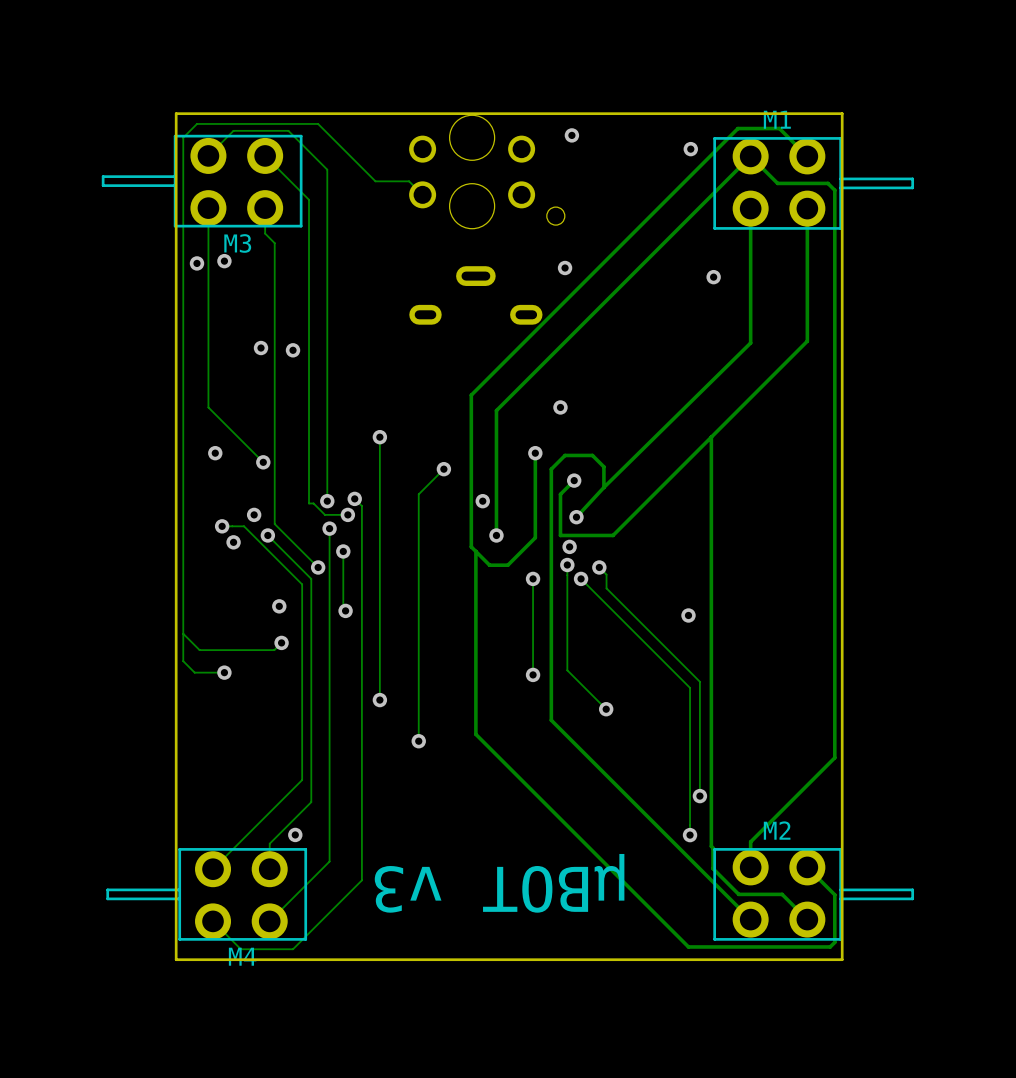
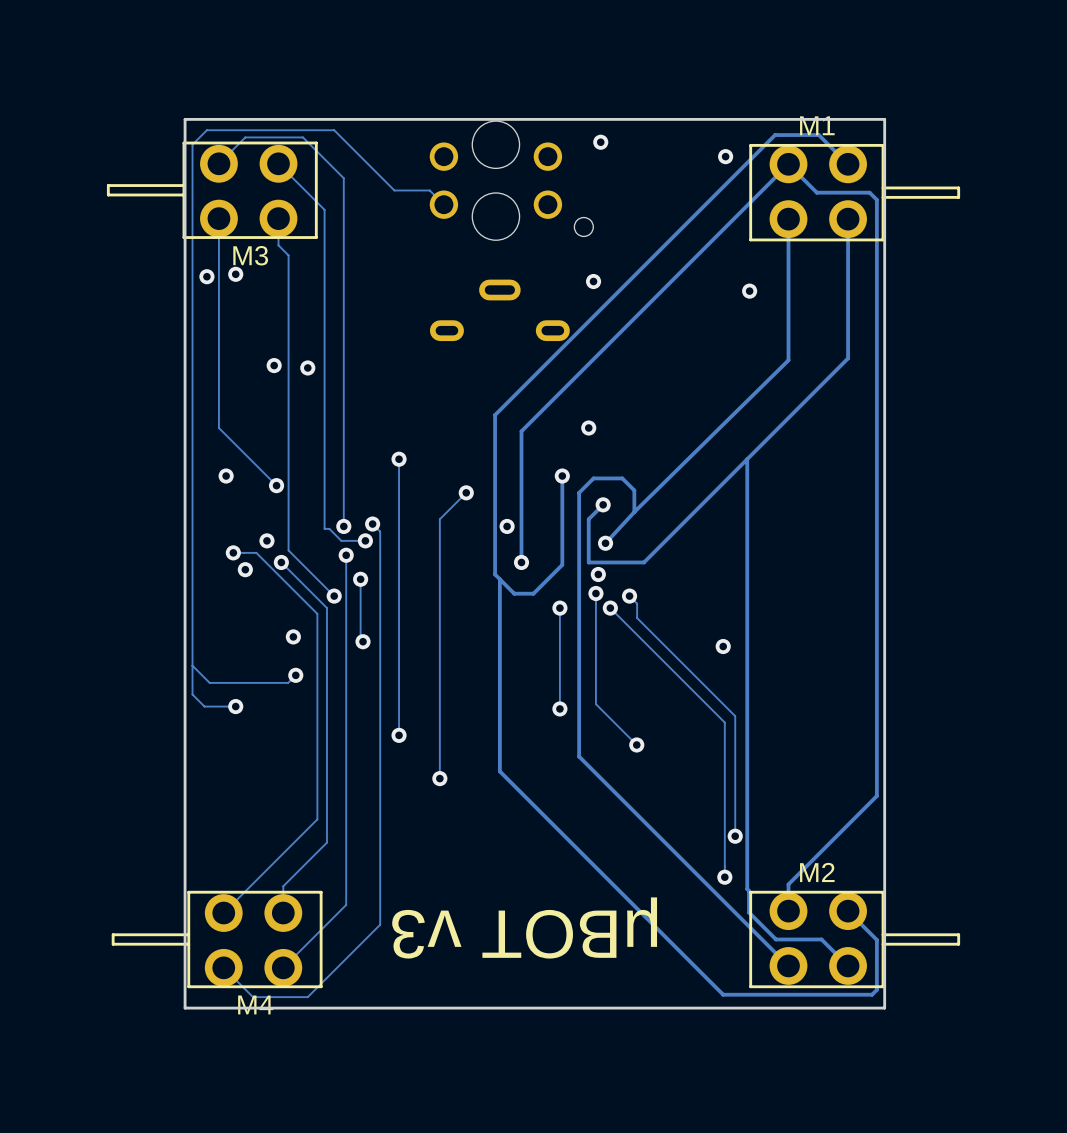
via: (295, 834) -> none

